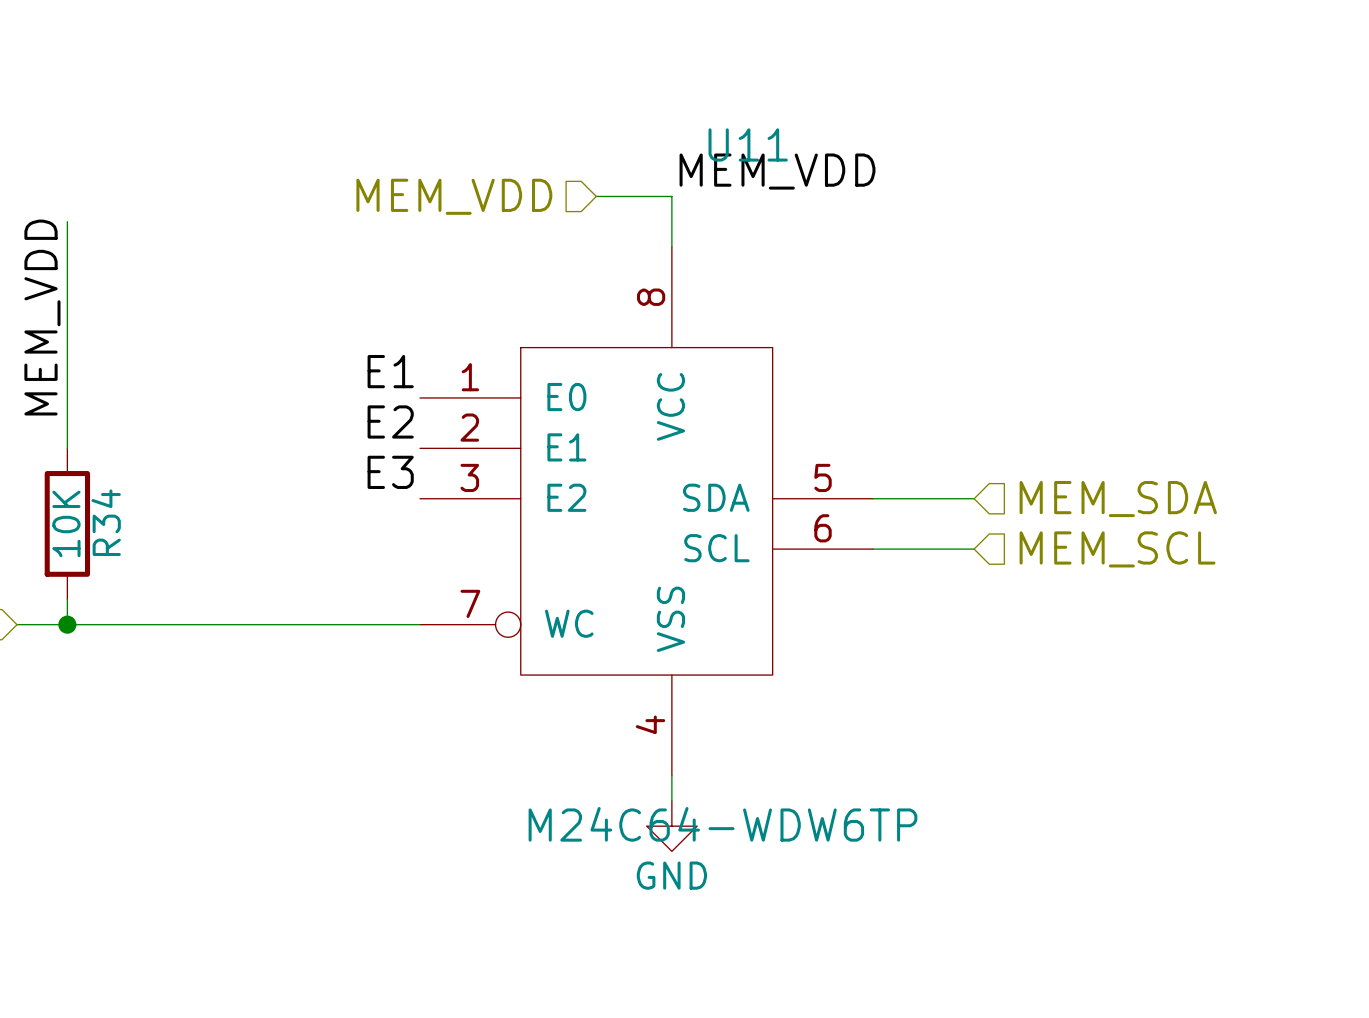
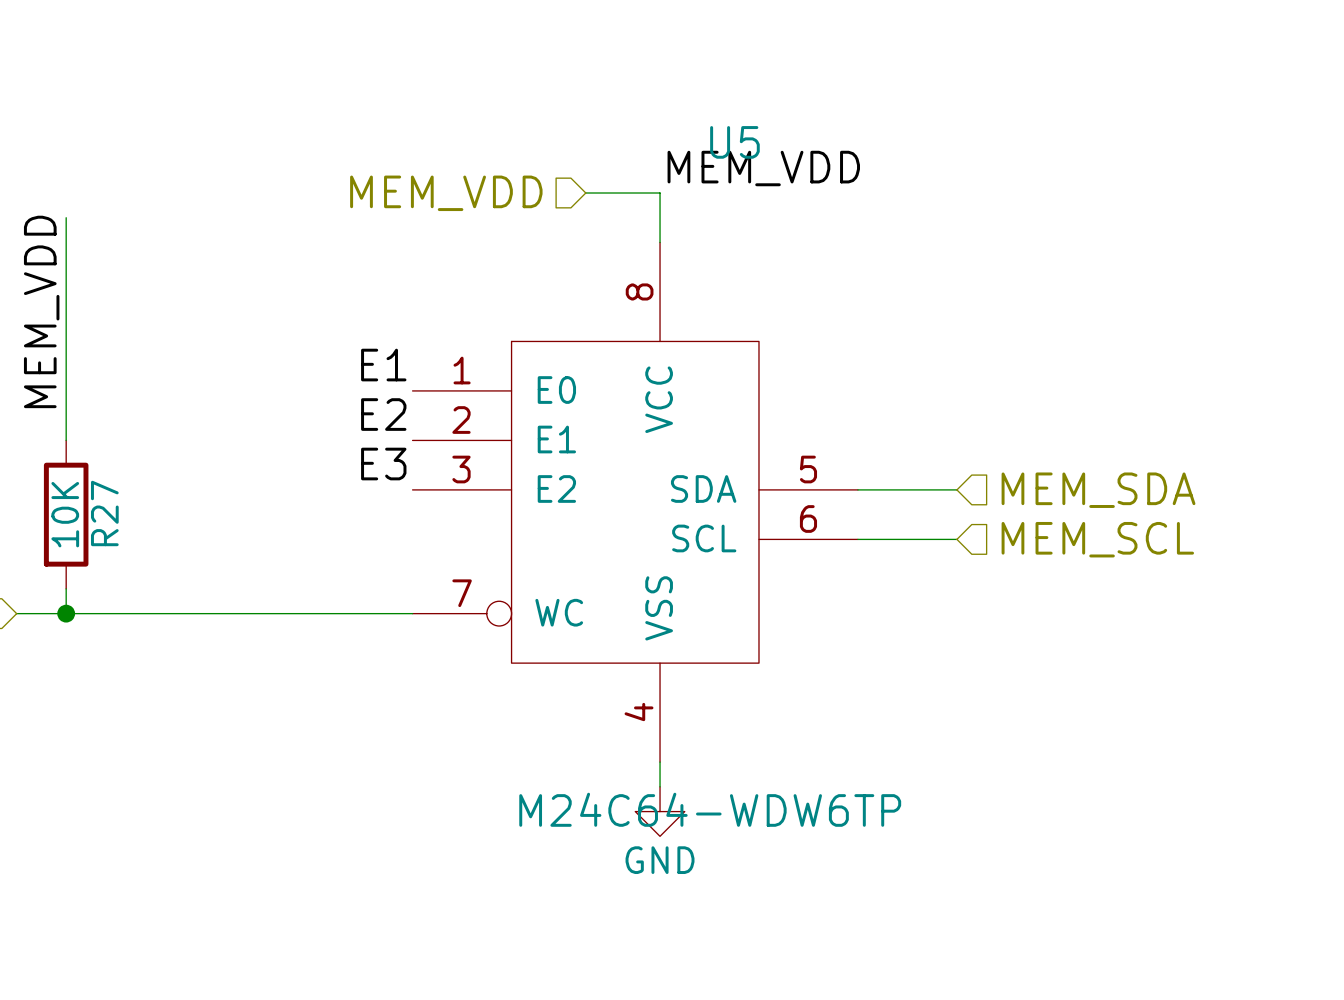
U11 name: U11 (748, 144) -> U5 (734, 142)
R34 name: R34 (106, 522) -> R27 (104, 513)

